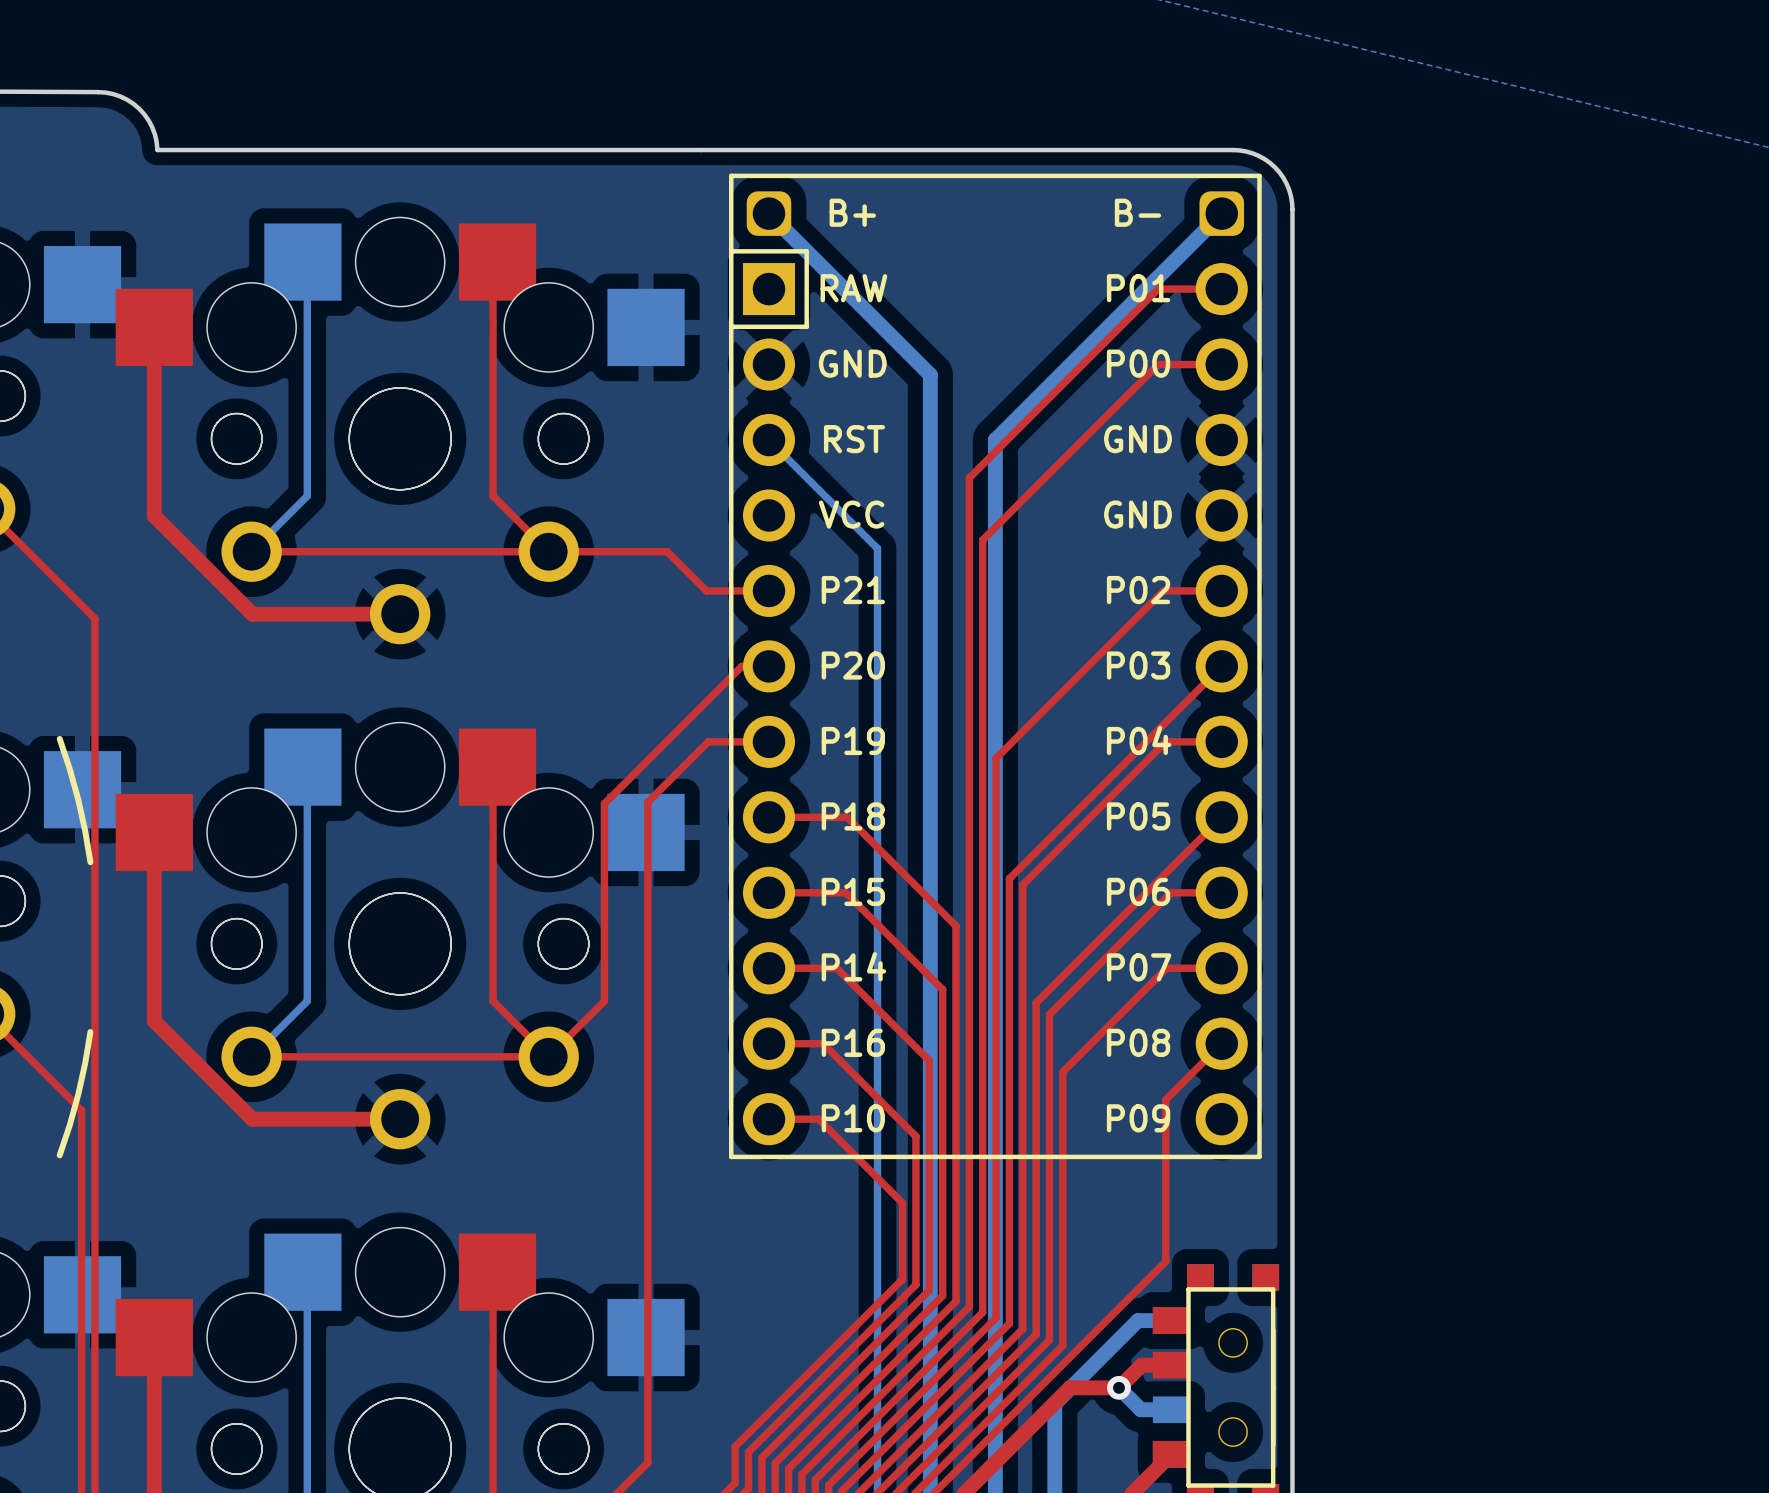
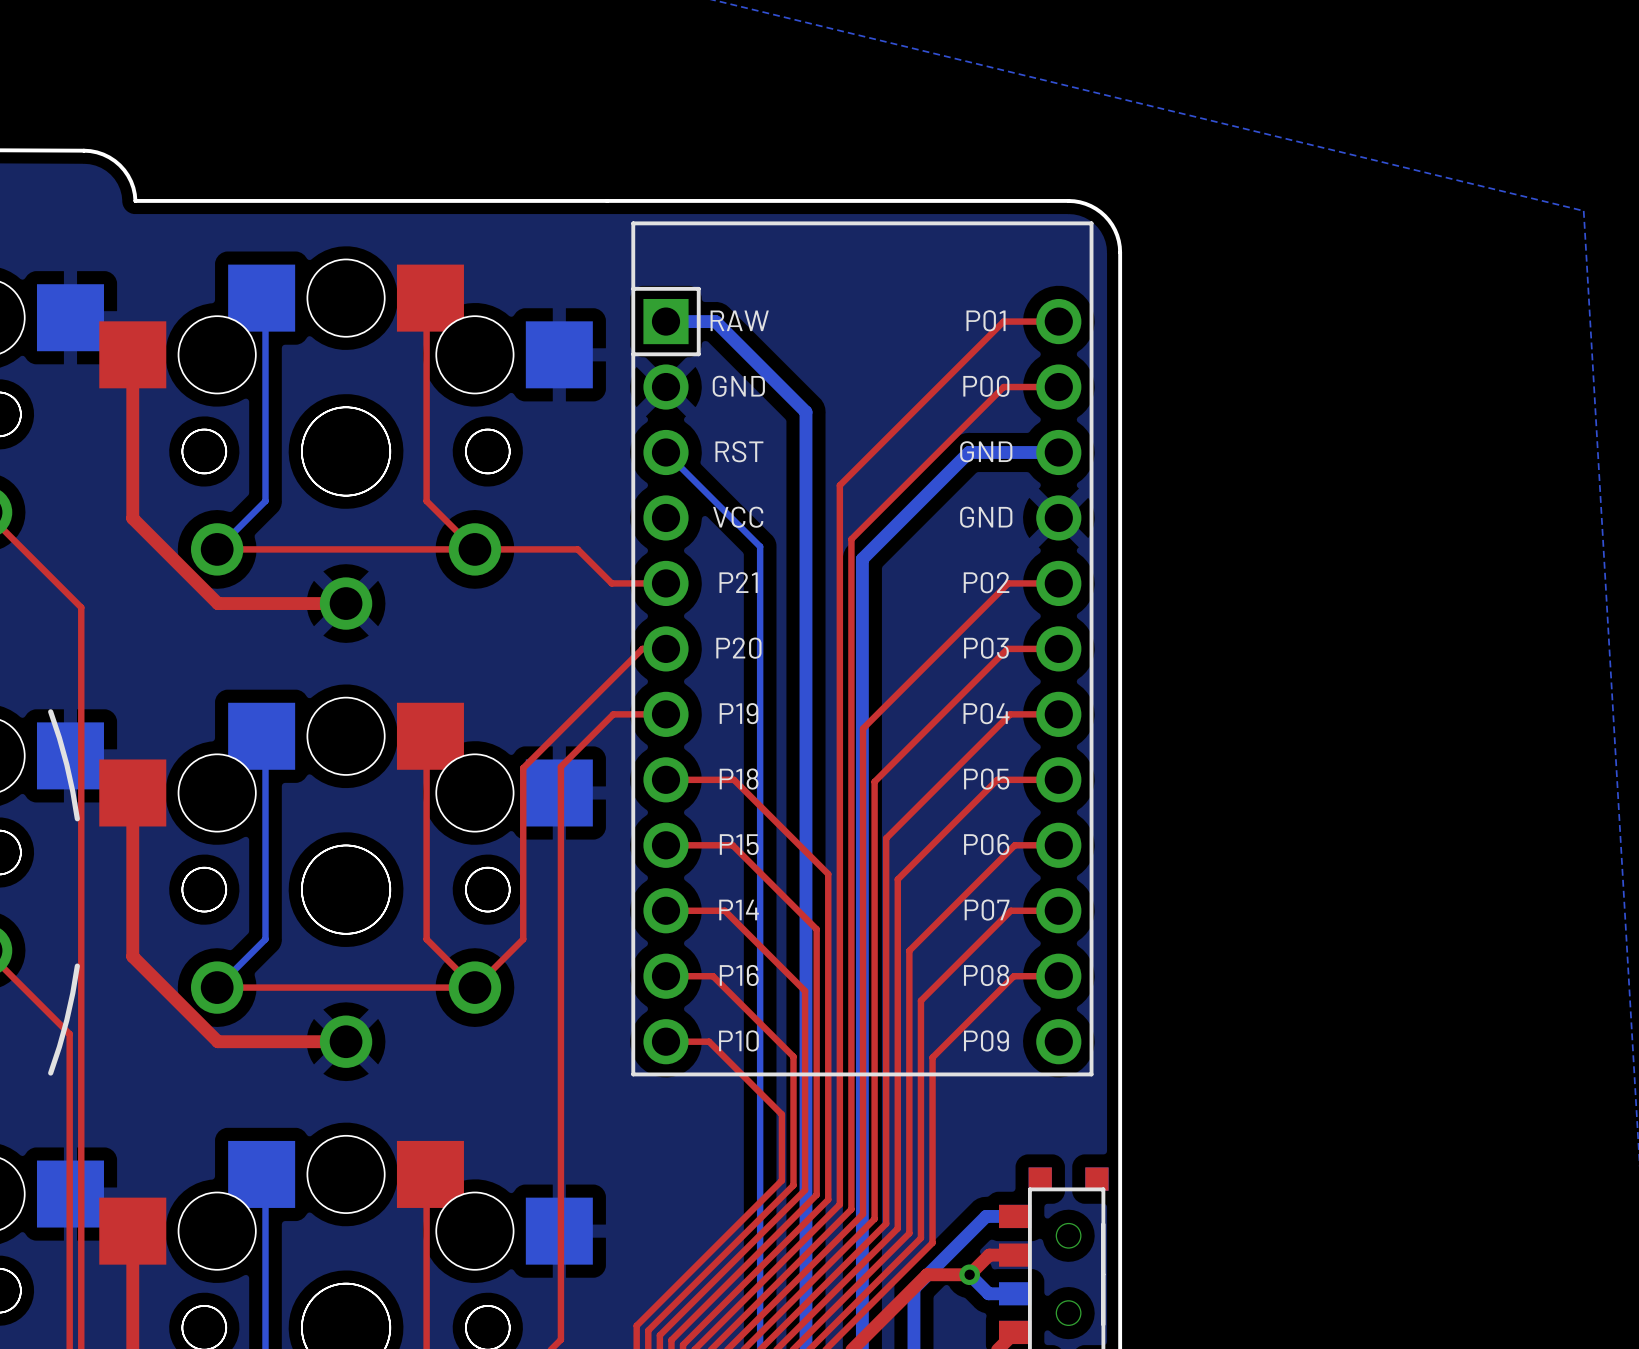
part footprint: [729, 173, 1262, 1160] -> [631, 221, 1094, 1077]
bottom track: (768, 213) (930, 374) (930, 393) -> (666, 321) (715, 321) (805, 412)
bottom track: (1221, 213) (995, 440) (995, 562) -> (1058, 452) (968, 452) (862, 559)
top track: (1221, 666) (1009, 878) -> (1058, 648) (1007, 648) (874, 781) (874, 833)
top track: (1221, 817) (1036, 1002) -> (1058, 779) (997, 779) (897, 879) (897, 940)
top track: (1221, 1043) (1165, 1099) (1165, 1261) (1076, 1351) -> (1058, 976) (1013, 976) (932, 1057) (932, 1242)

